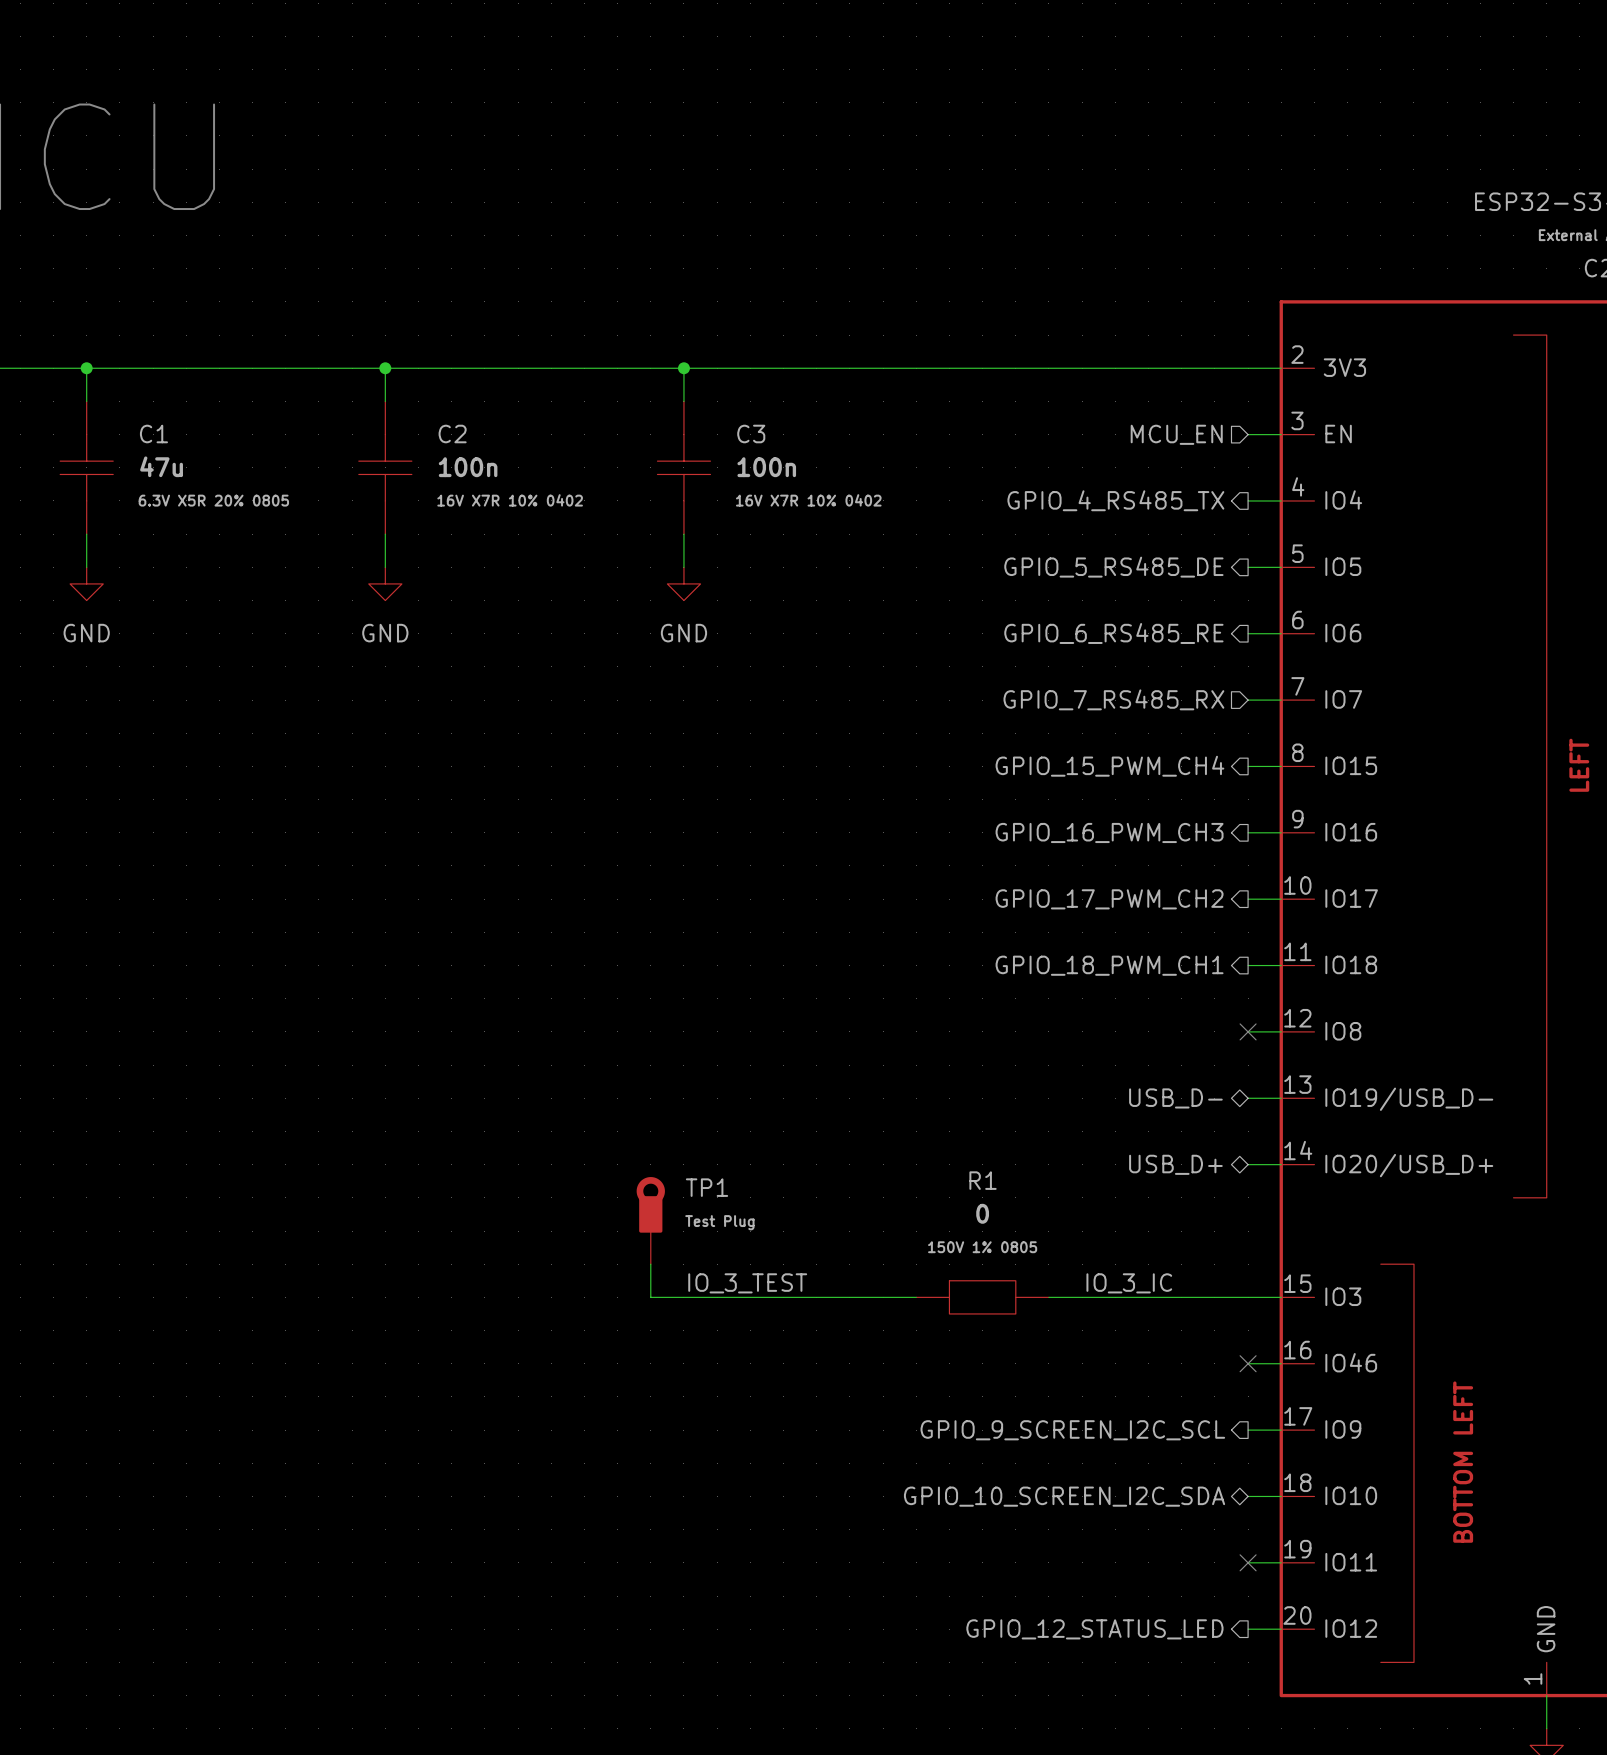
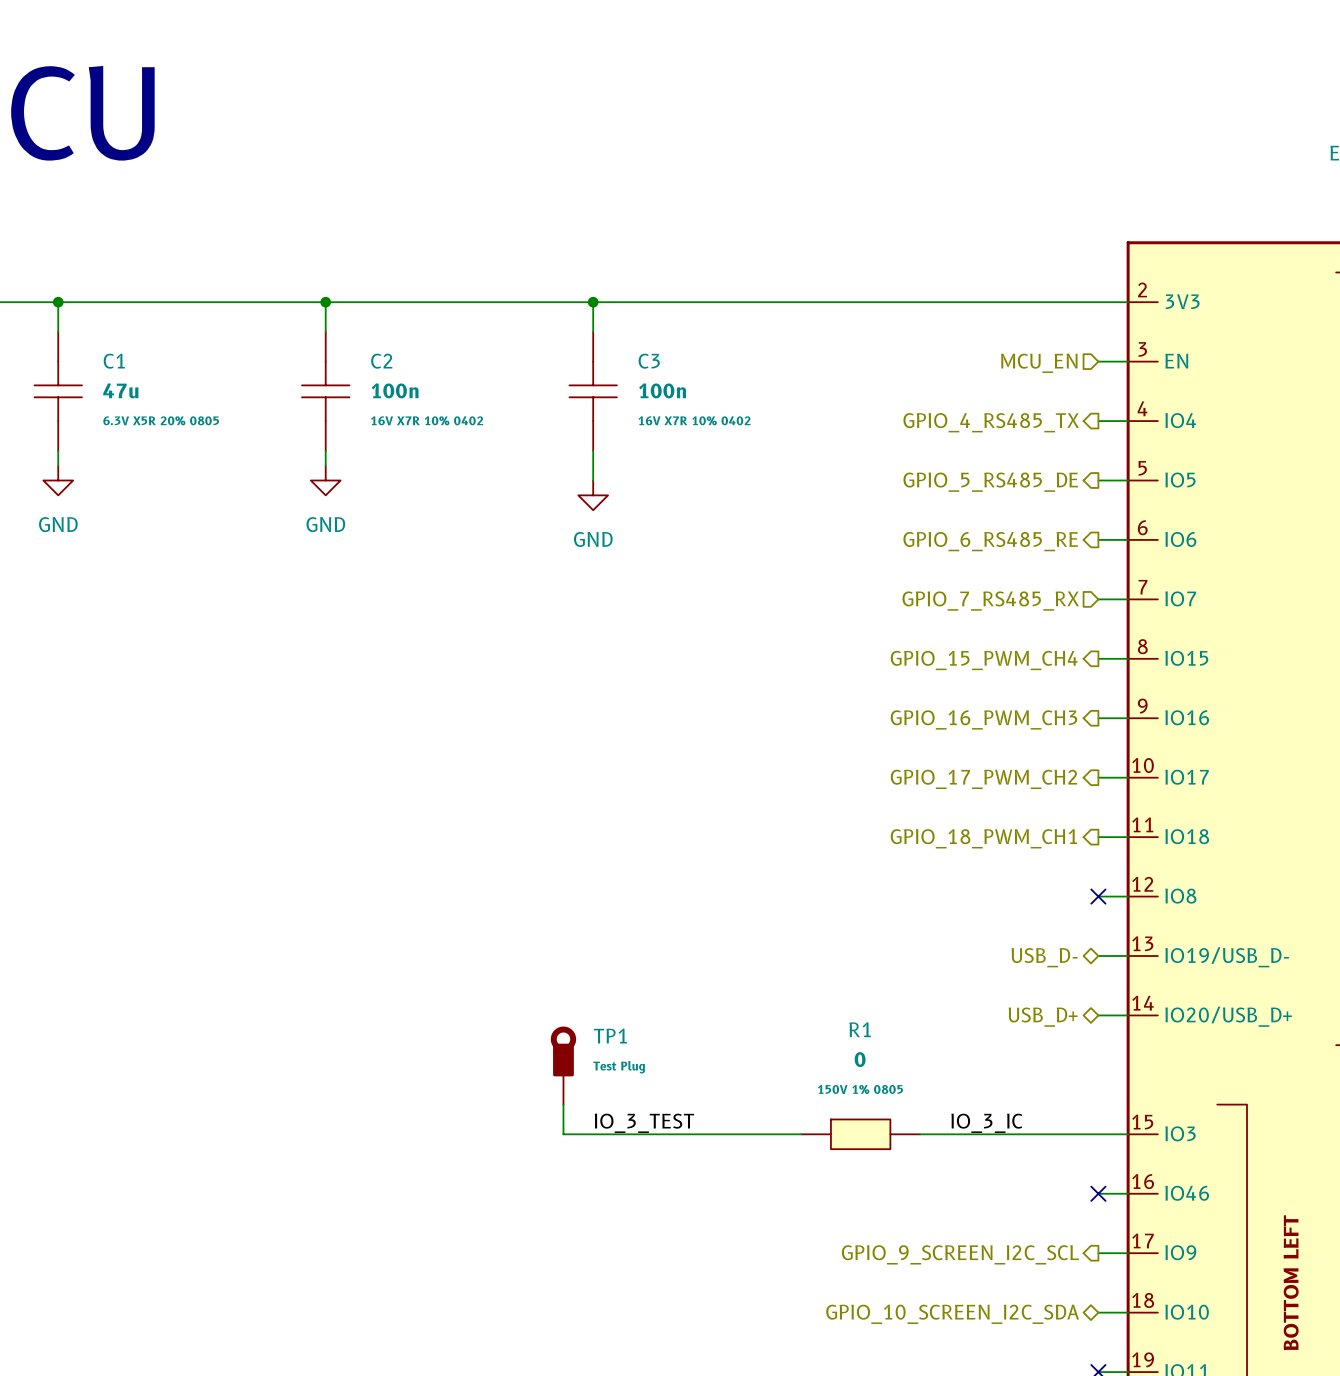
power symbol position: GND (86, 583) -> GND (58, 480)
power symbol position: GND (385, 583) -> GND (325, 480)

